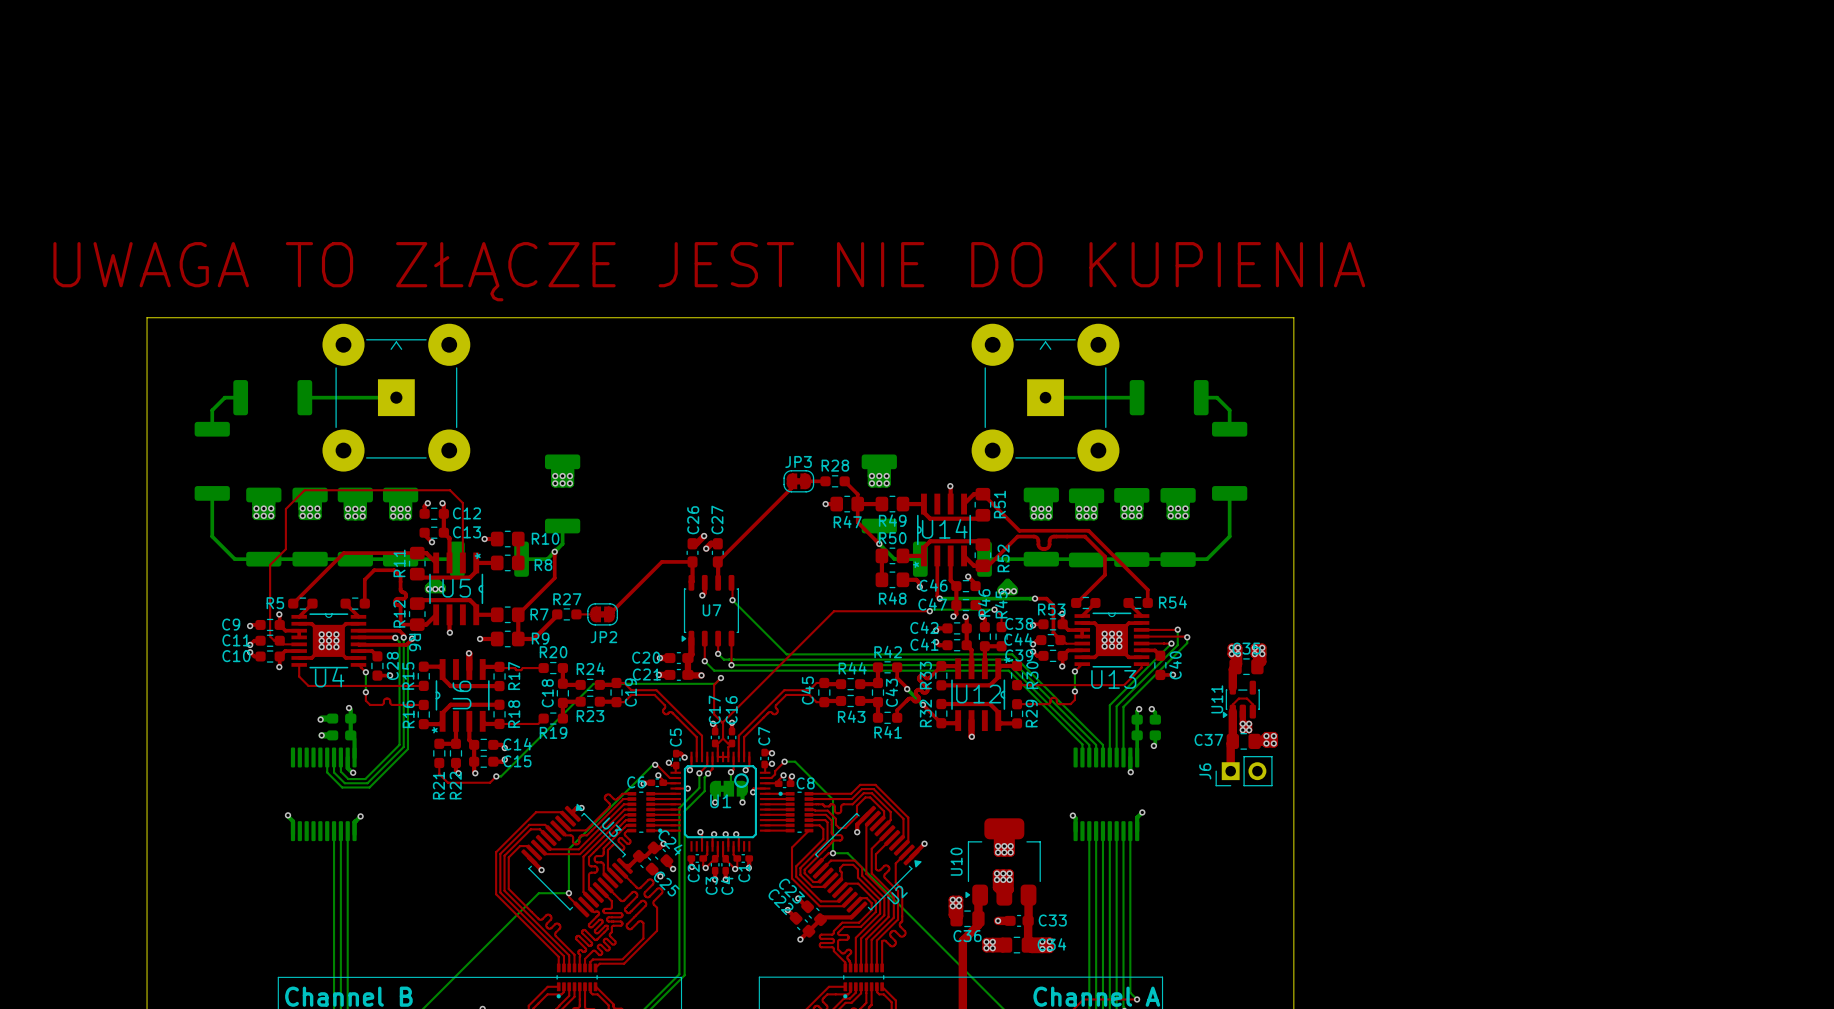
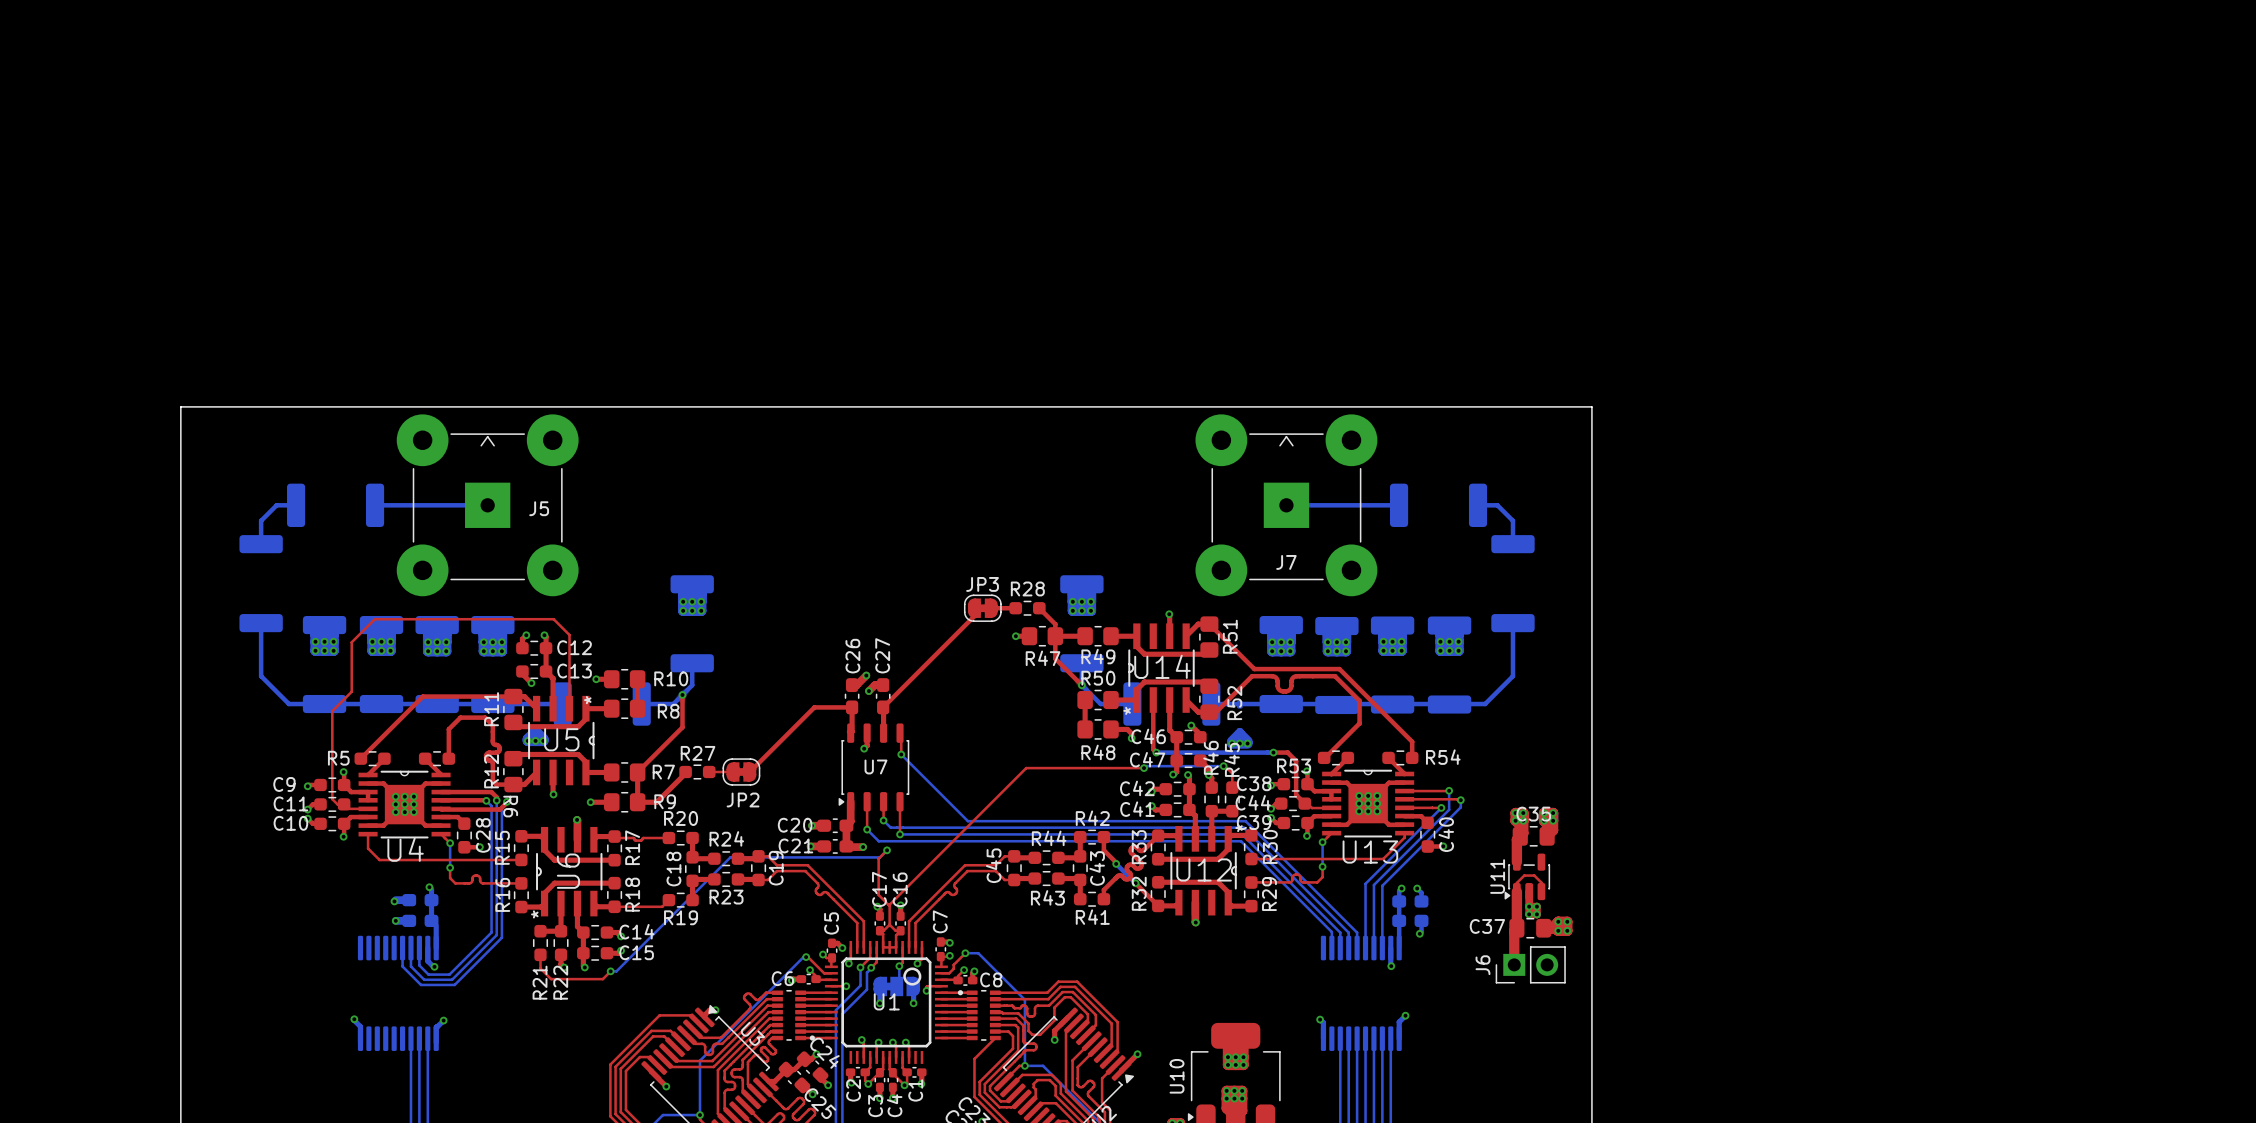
text: UWAGA TO ZŁĄCZE JEST NIE DO KUPIENIA (709, 271) -> none
part: (396, 397) -> none
J5: none -> (487, 505)
J7 name: none -> J7 (1286, 562)

